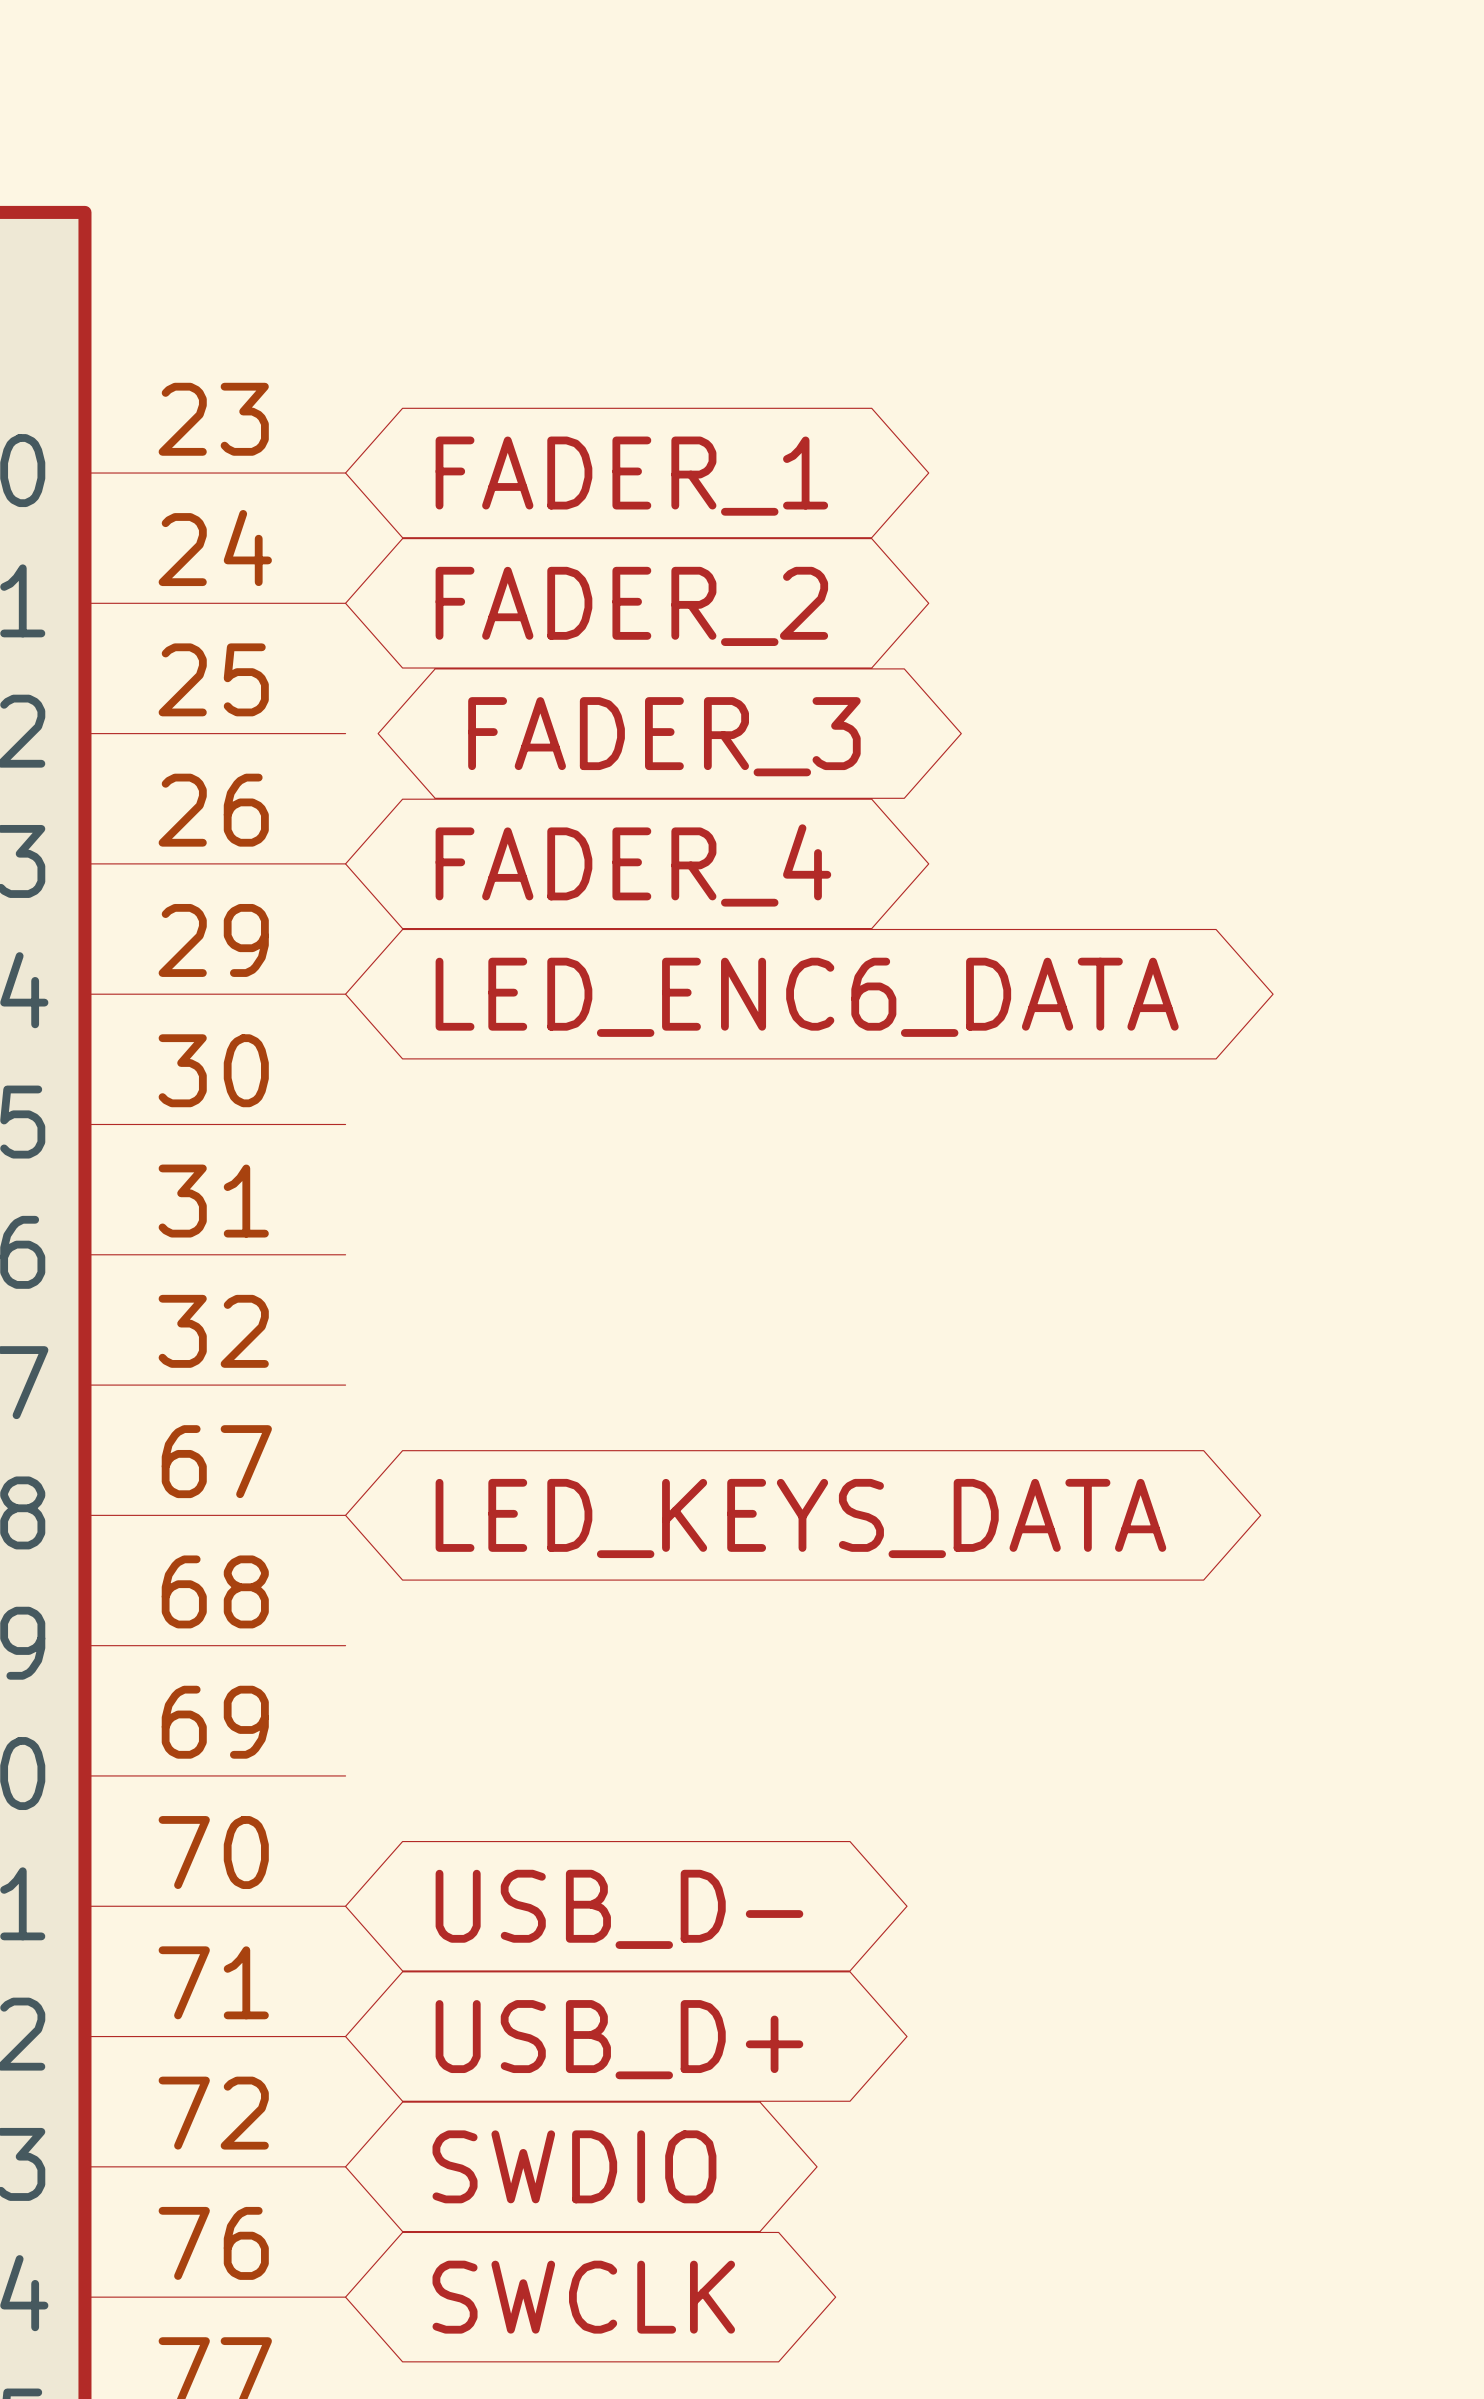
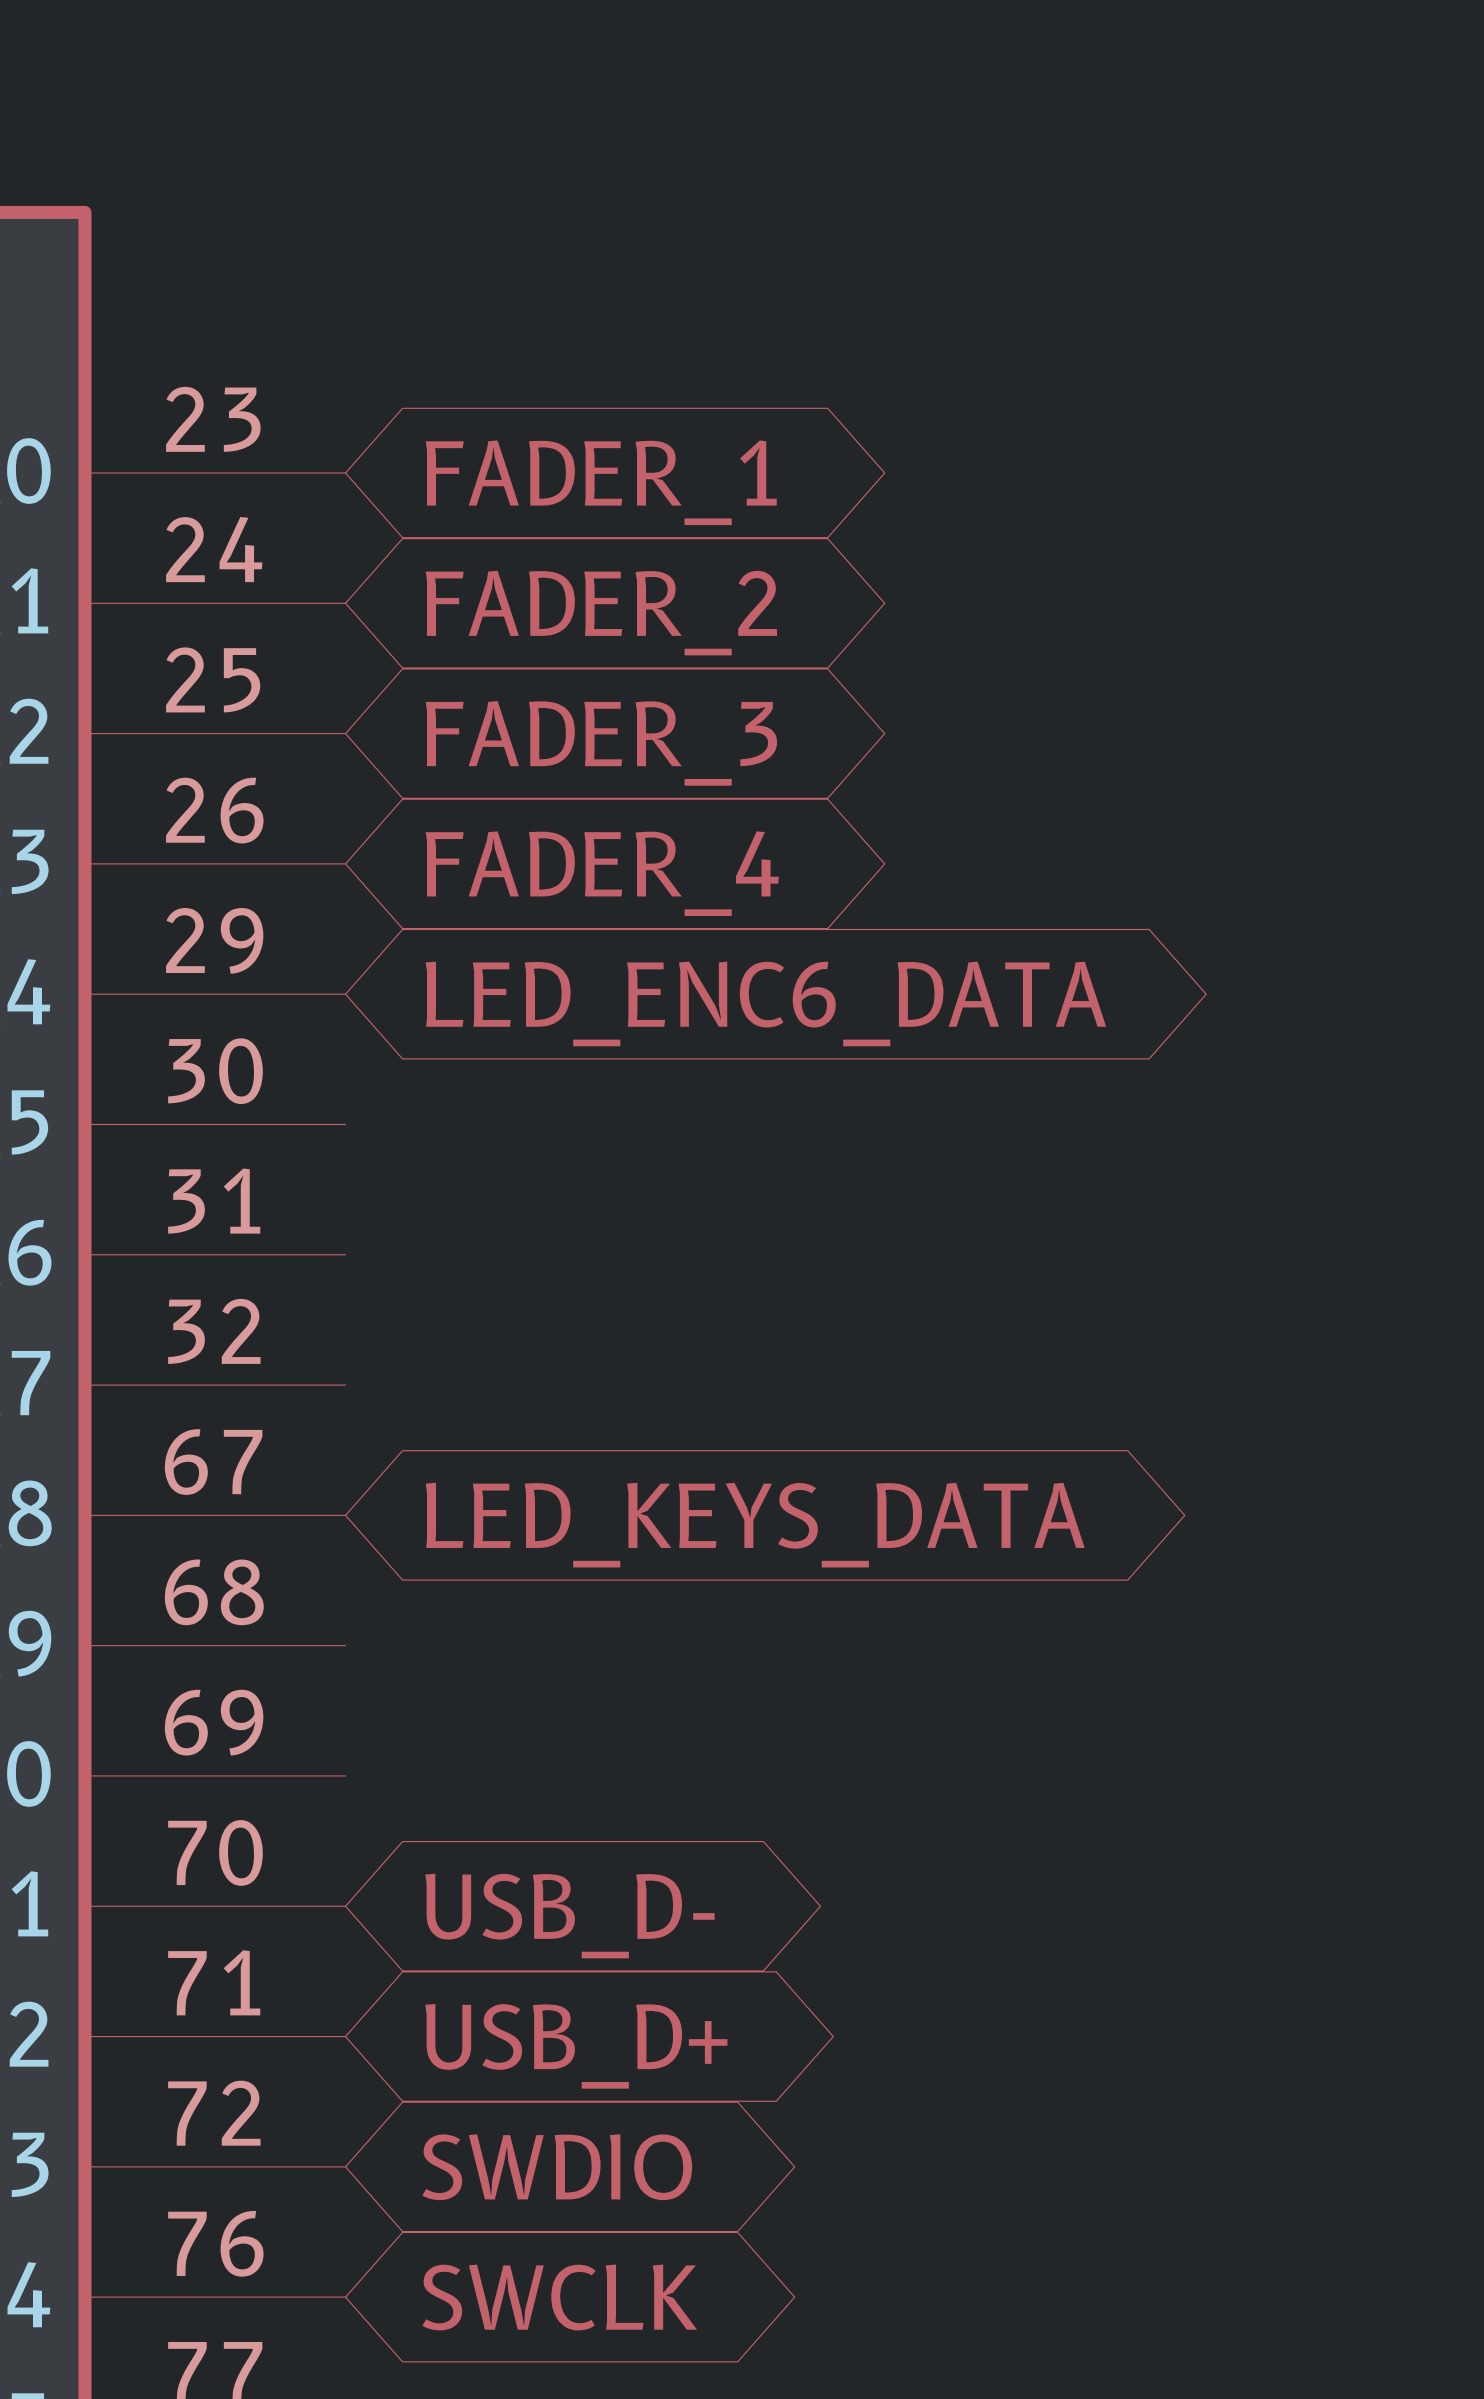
global label position: FADER_3 (664, 736) -> FADER_3 (601, 743)

